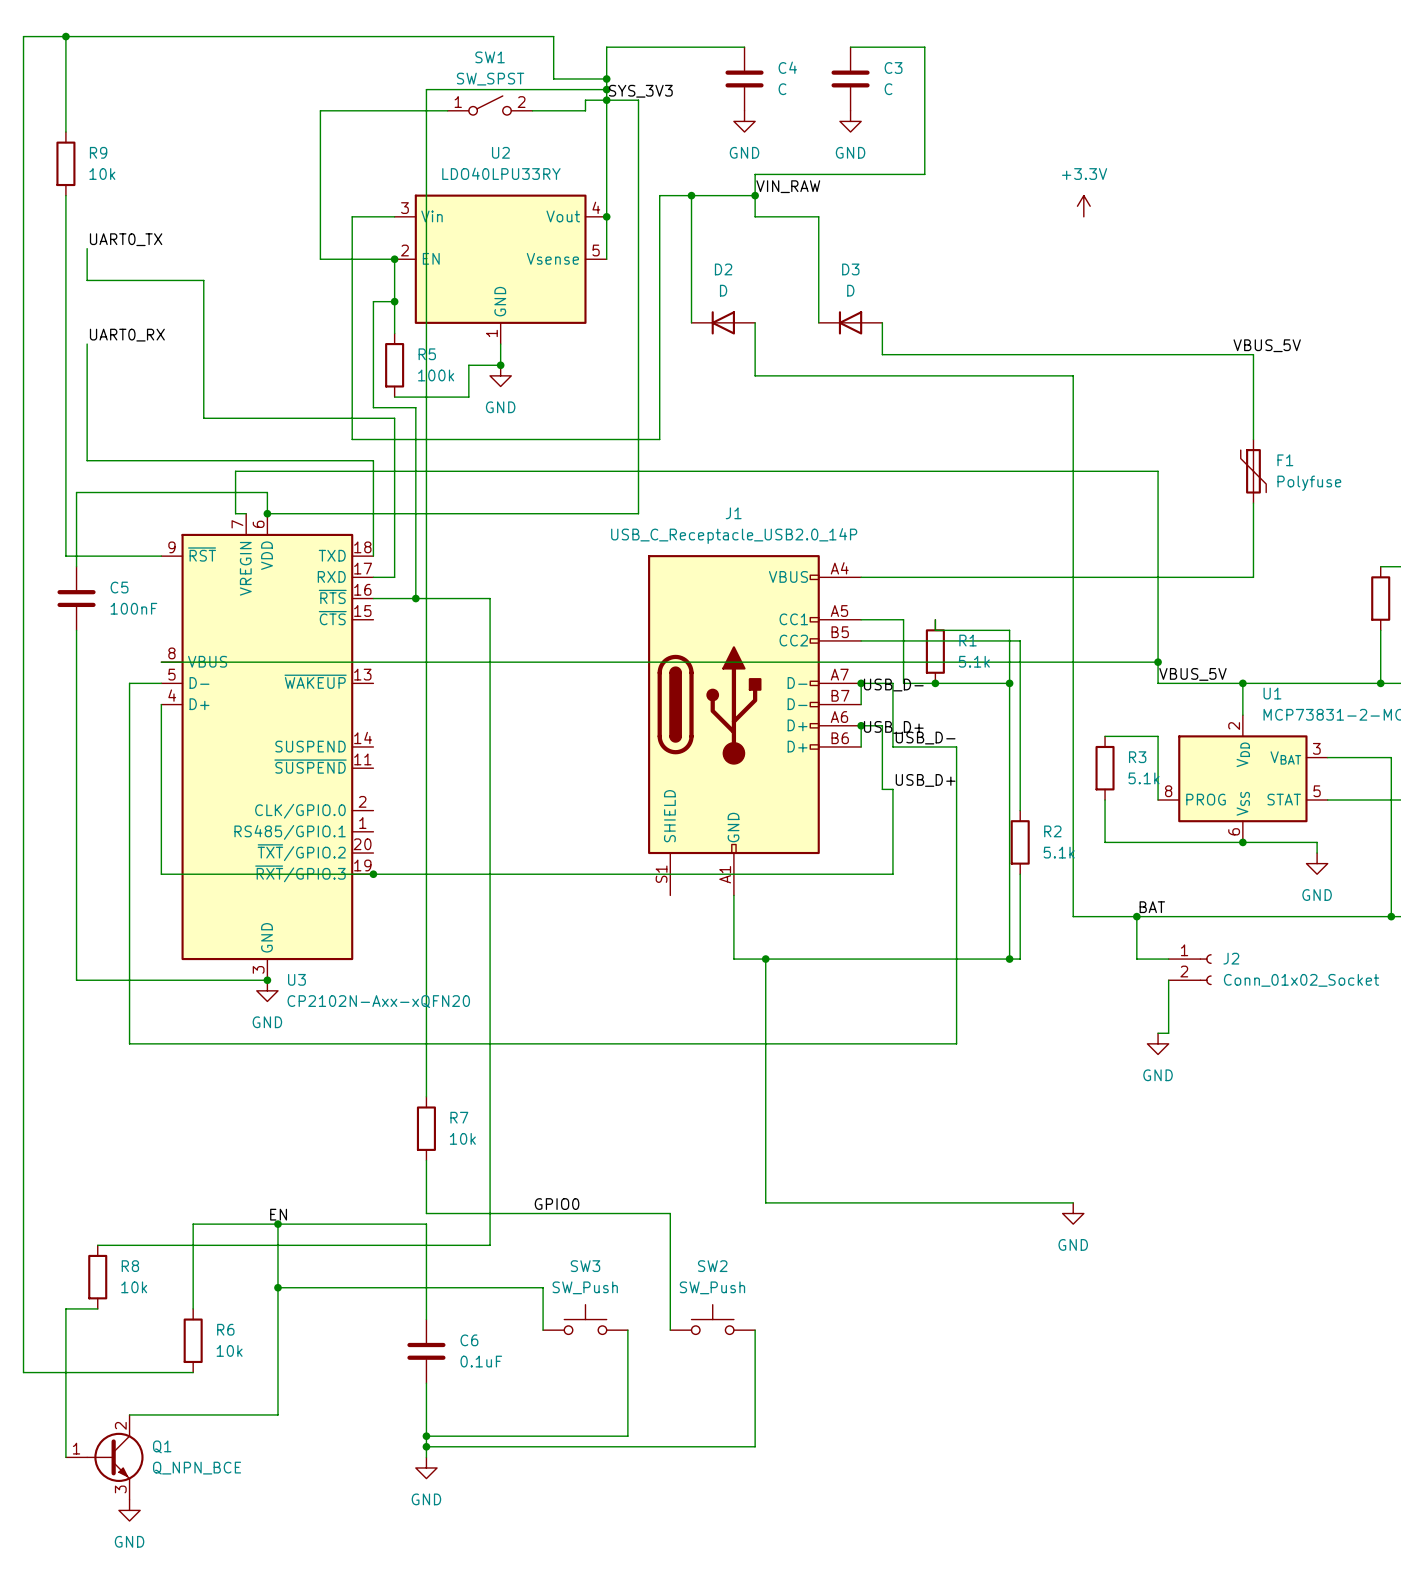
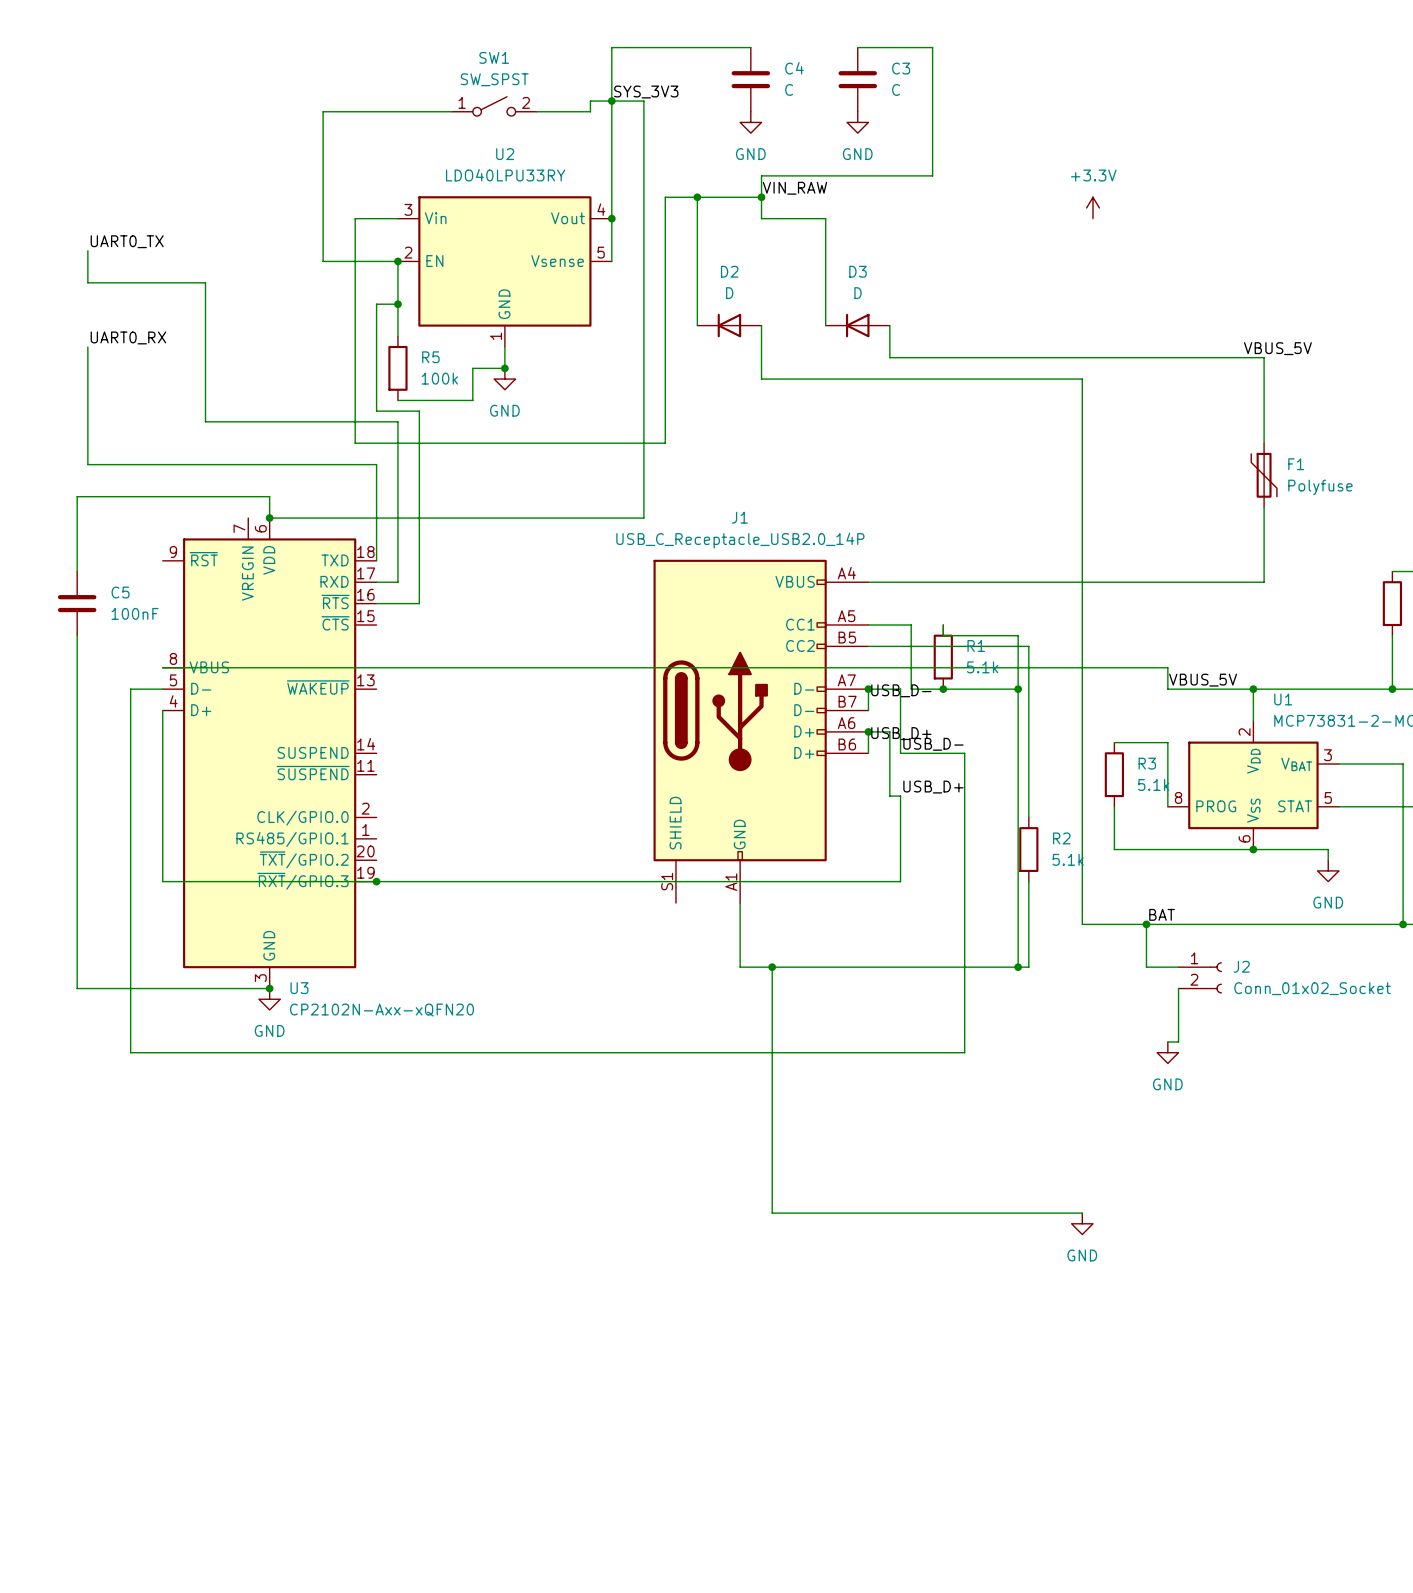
wire: (65, 36) (65, 132) -> none
junction: (65, 36) -> none
wire: (606, 78) (553, 78) (553, 36) (23, 36) (23, 1372) (193, 1372) -> none
junction: (606, 78) -> none
wire: (606, 89) (426, 89) (426, 1096) -> none
junction: (606, 89) -> none
R9: 10k (65, 163) -> none
wire: (65, 195) (65, 556) (161, 556) -> none
wire: (246, 513) (235, 513) (235, 471) (1158, 471) (1158, 662) -> none
wire: (415, 598) (490, 598) (490, 1245) (97, 1245) -> none
junction: (415, 598) -> none
junction: (1158, 662) -> none
R7: 10k (426, 1128) -> none
wire: (426, 1160) (426, 1213) (670, 1213) (670, 1330) -> none
label: GPIO0 (557, 1204) -> none
label: EN (278, 1214) -> none
wire: (277, 1224) (277, 1414) (129, 1414) -> none
junction: (277, 1224) -> none
R8: 10k (97, 1277) -> none
wire: (277, 1287) (543, 1287) (543, 1330) -> none
junction: (277, 1287) -> none
wire: (97, 1308) (65, 1308) (65, 1457) -> none
wire: (193, 1308) (193, 1224) (426, 1224) (426, 1319) -> none
SW3: SW_Push (585, 1319) -> none
SW2: SW_Push (712, 1319) -> none
wire: (627, 1330) (627, 1436) (426, 1436) -> none
wire: (755, 1330) (755, 1446) (426, 1446) -> none
R6: 10k (193, 1340) -> none
C6: 0.1uF (426, 1351) -> none
wire: (426, 1383) (426, 1457) -> none
junction: (426, 1436) -> none
junction: (426, 1446) -> none
Q1: Q_NPN_BCE (104, 1457) -> none
power symbol: GND (426, 1467) -> none
power symbol: GND (129, 1510) -> none

